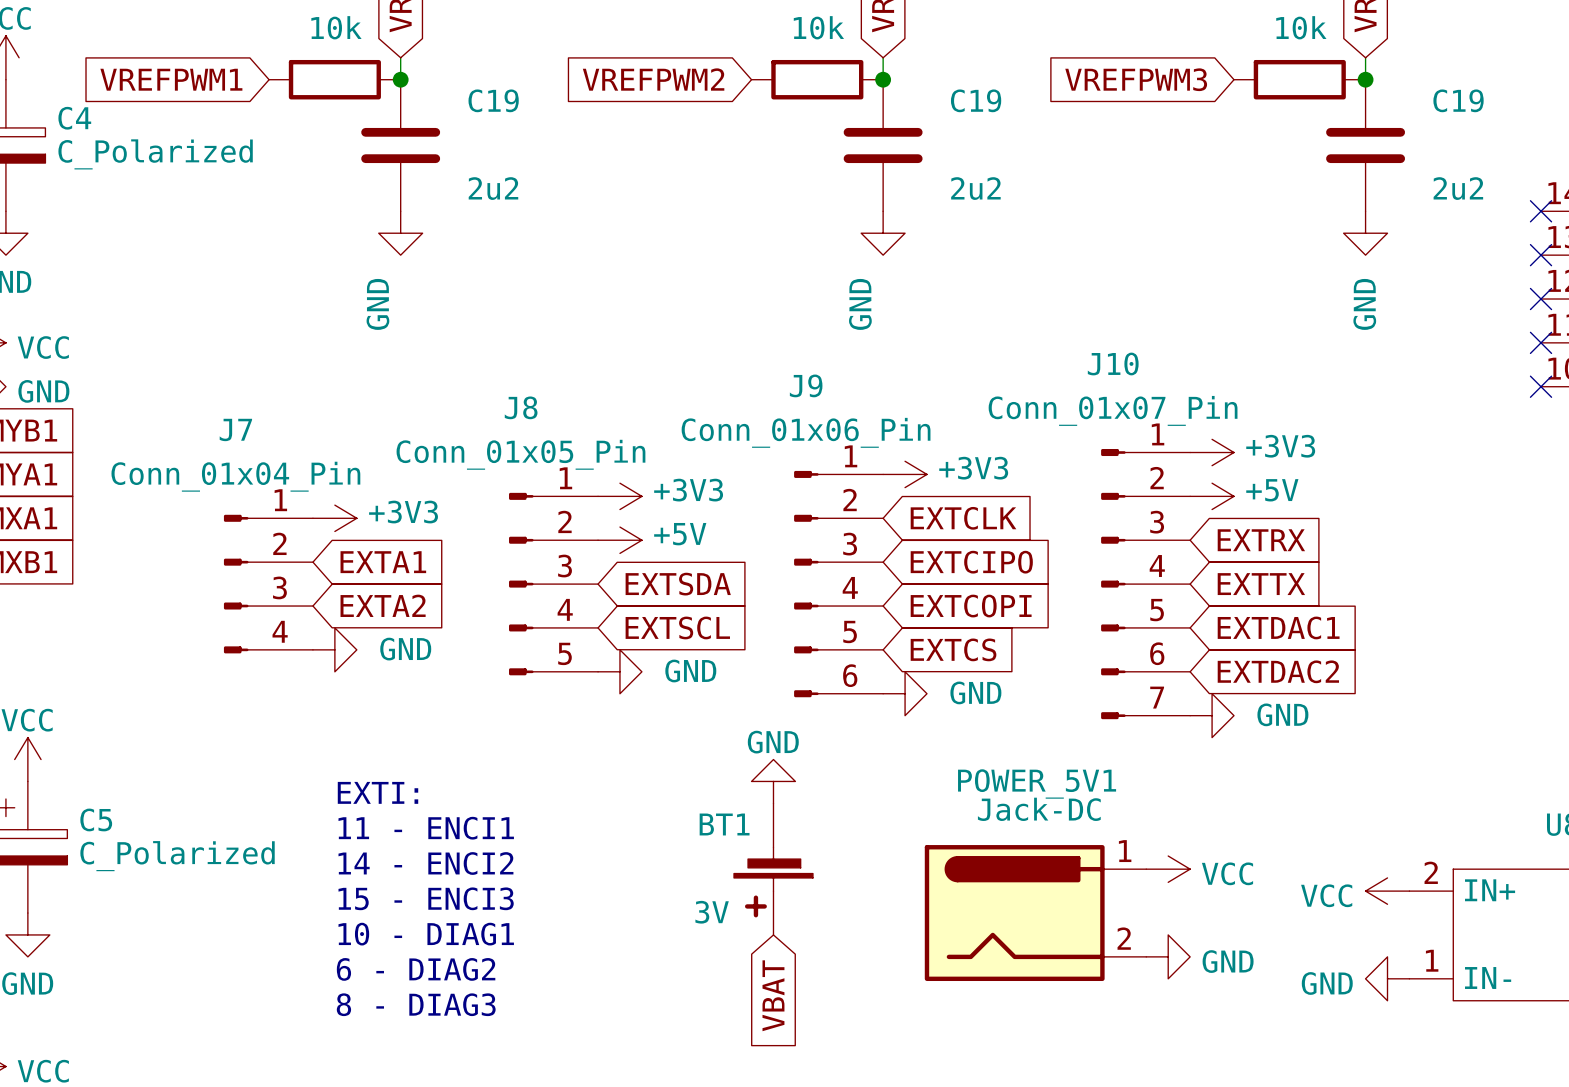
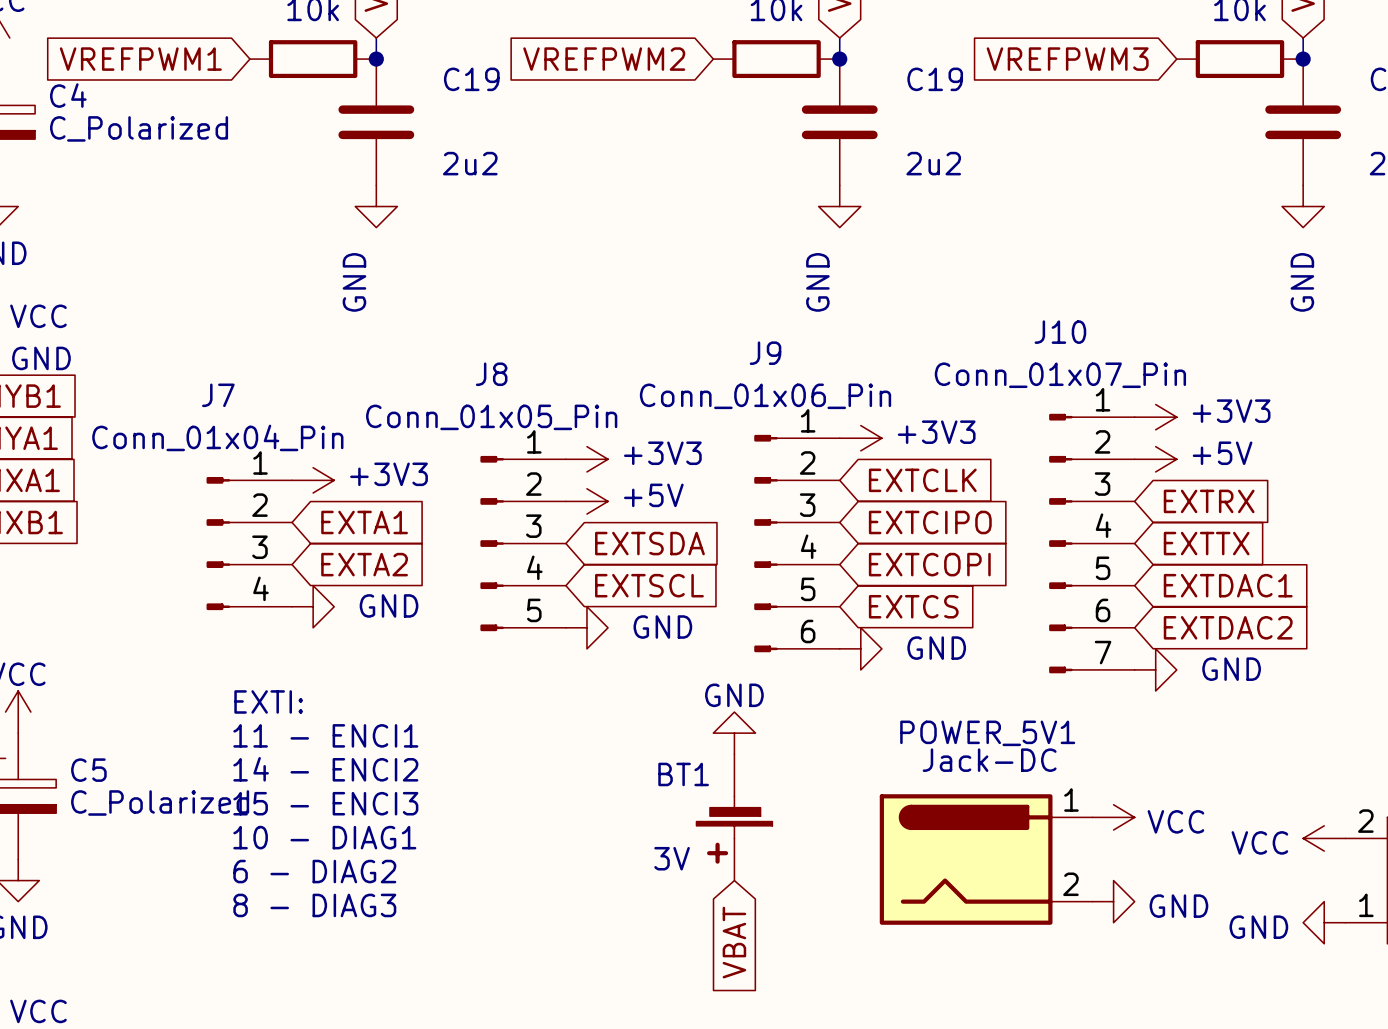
text position: EXTI: (378, 792) -> EXTI: (268, 701)
text position: 11 - ENCI1 (426, 828) -> 11 - ENCI1 (325, 735)
text position: 14 - ENCI2 (425, 863) -> 14 - ENCI2 (325, 769)
text position: 15 - ENCI3 (426, 898) -> 15 - ENCI3 (325, 803)
text position: 10 - DIAG1 (426, 934) -> 10 - DIAG1 (324, 837)
text position: 6 - DIAG2 (416, 969) -> 6 - DIAG2 (314, 871)
text position: 8 - DIAG3 (416, 1004) -> 8 - DIAG3 (314, 905)

